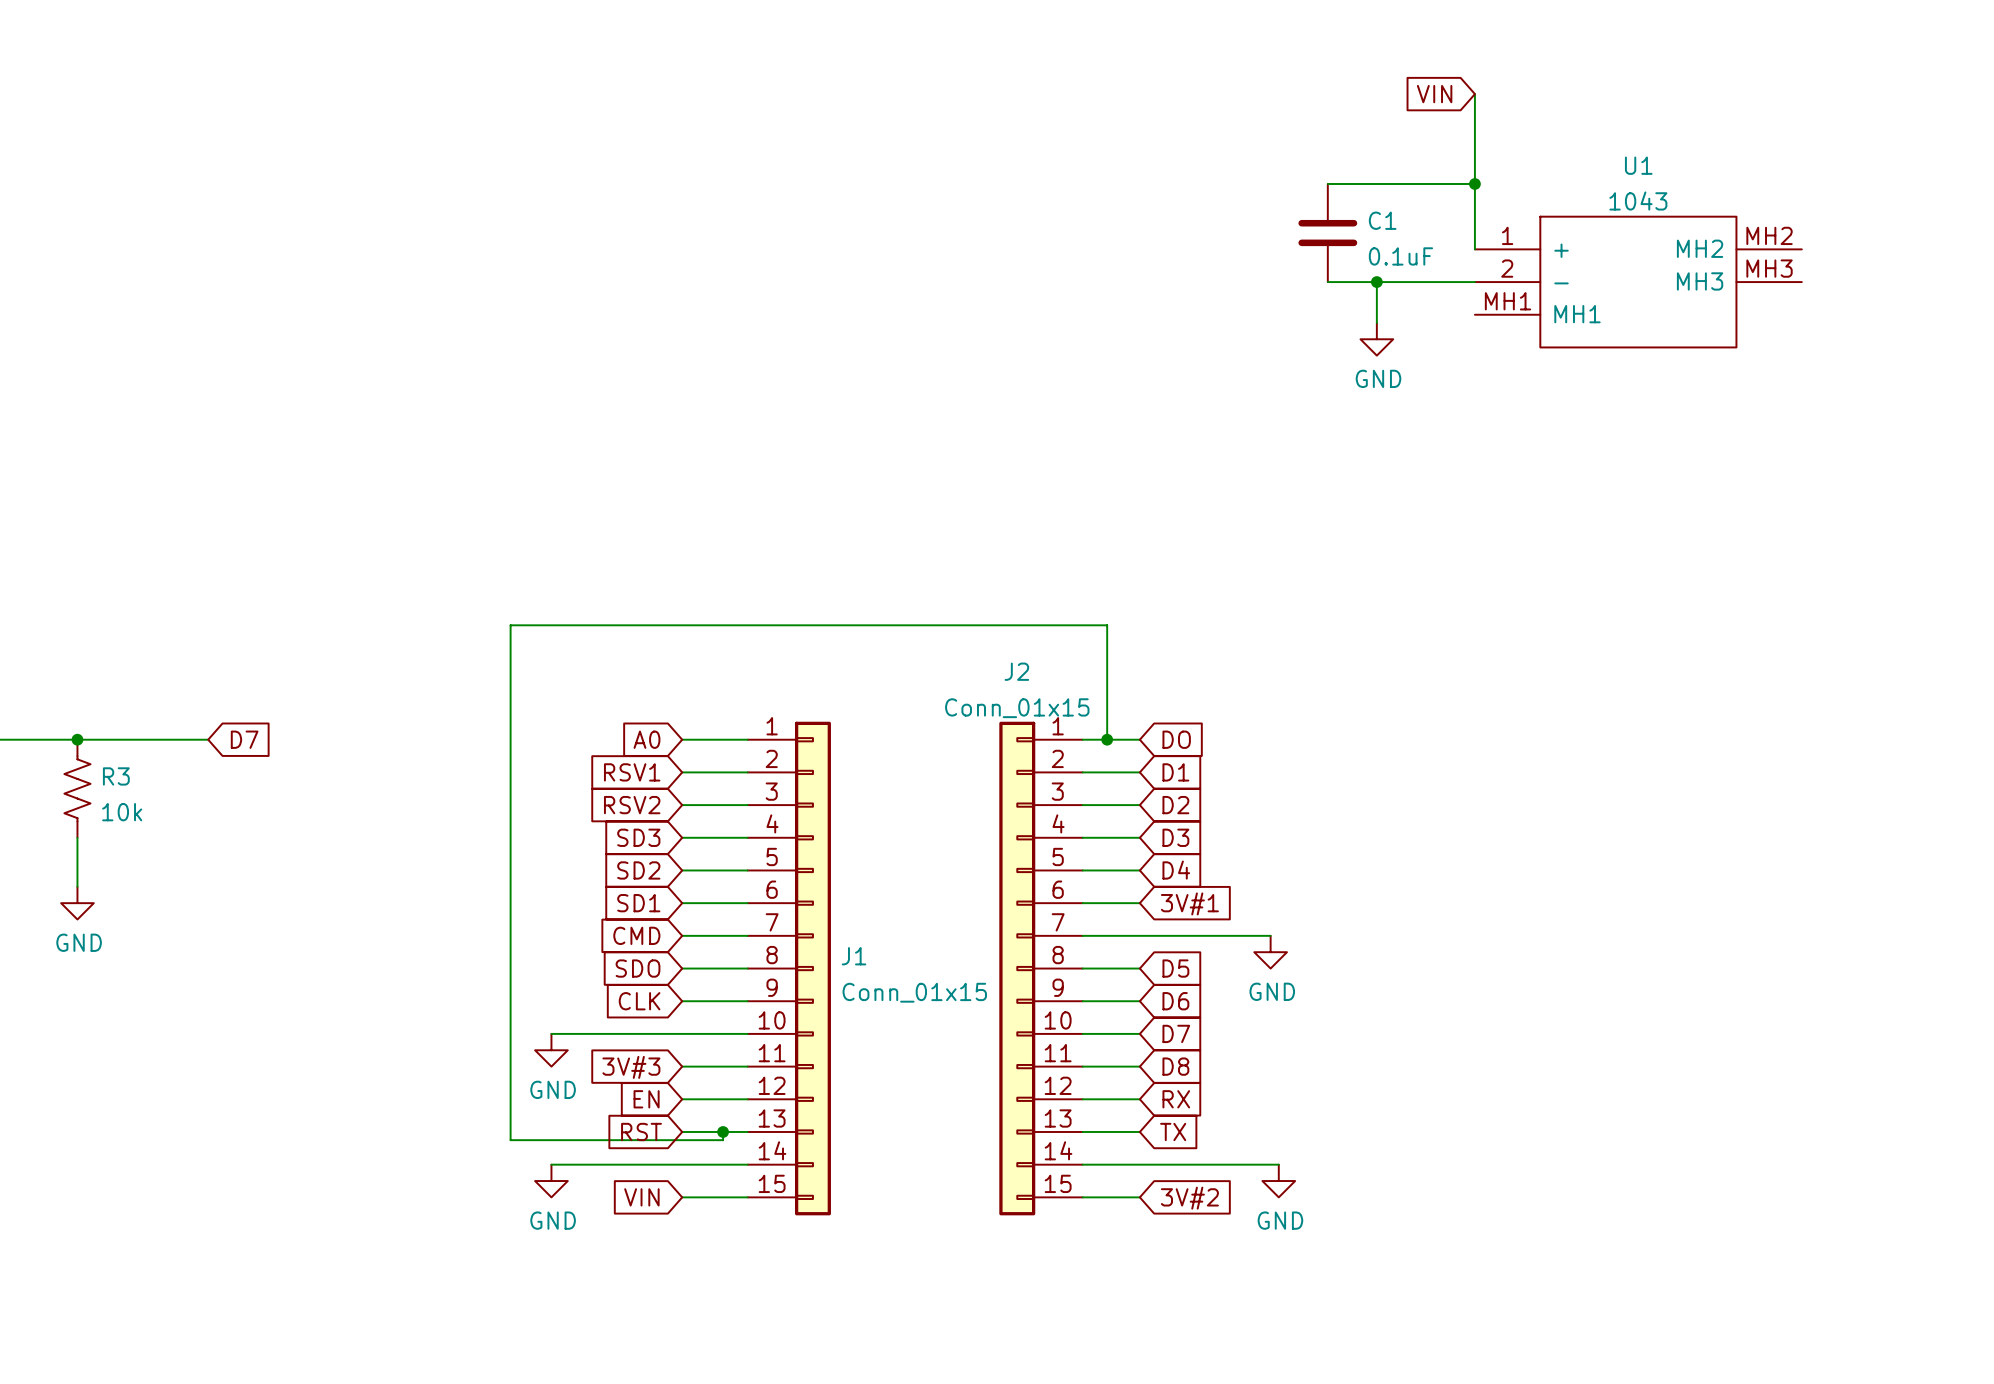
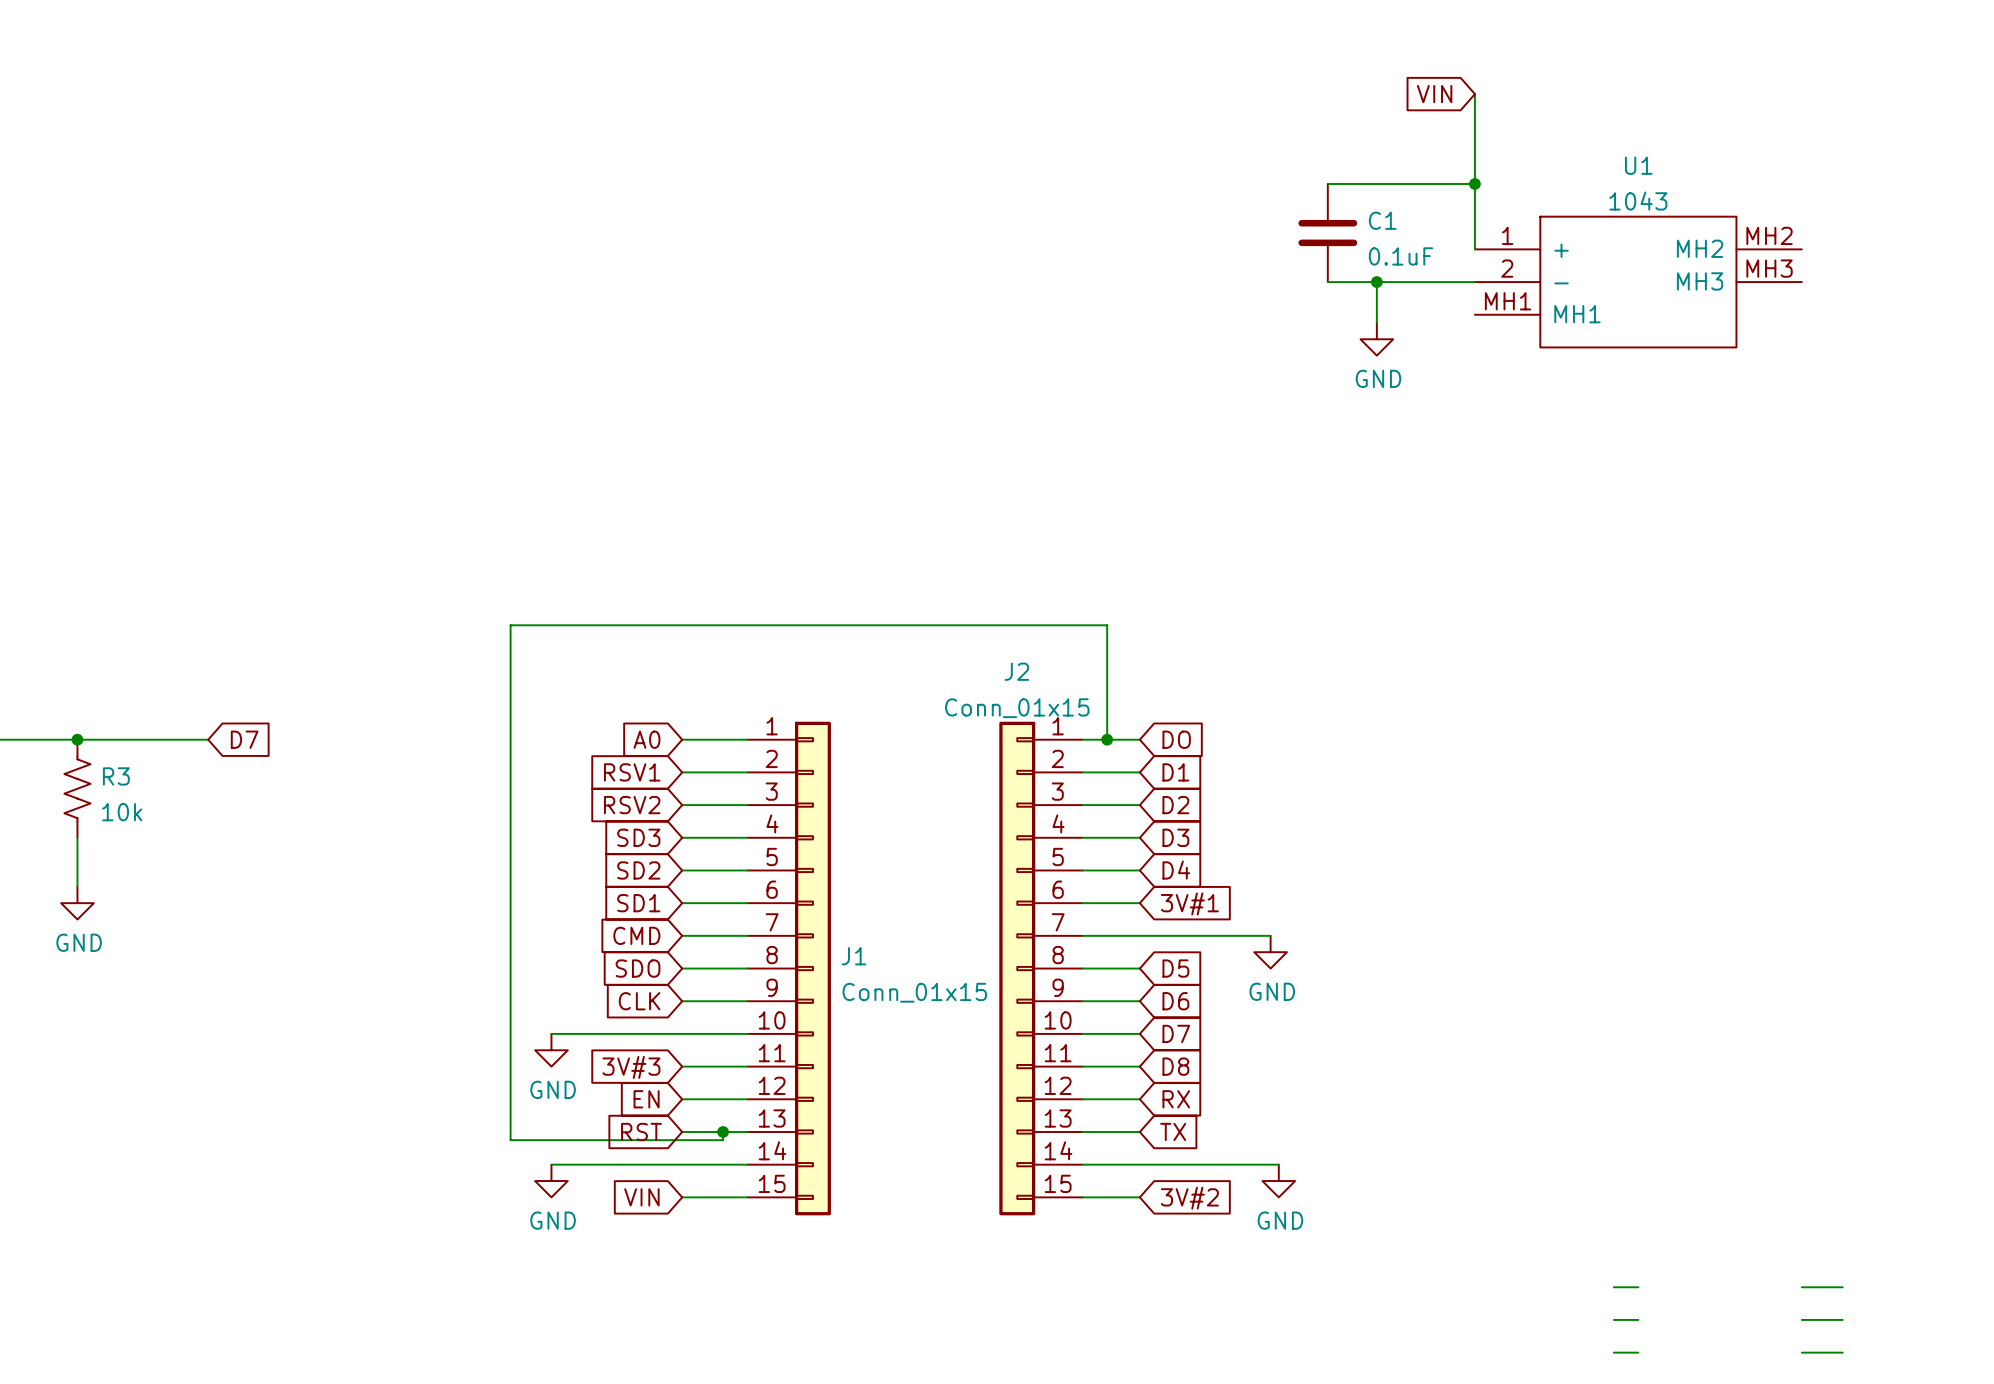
wire: none -> (1613, 1287) (1638, 1287)
wire: none -> (1801, 1287) (1842, 1287)
wire: none -> (1613, 1319) (1638, 1319)
wire: none -> (1801, 1319) (1842, 1319)
wire: none -> (1613, 1352) (1638, 1352)
wire: none -> (1801, 1352) (1842, 1352)

